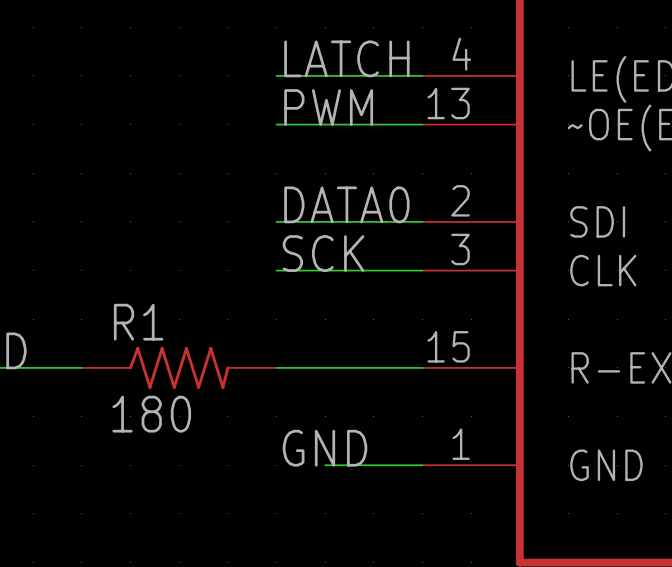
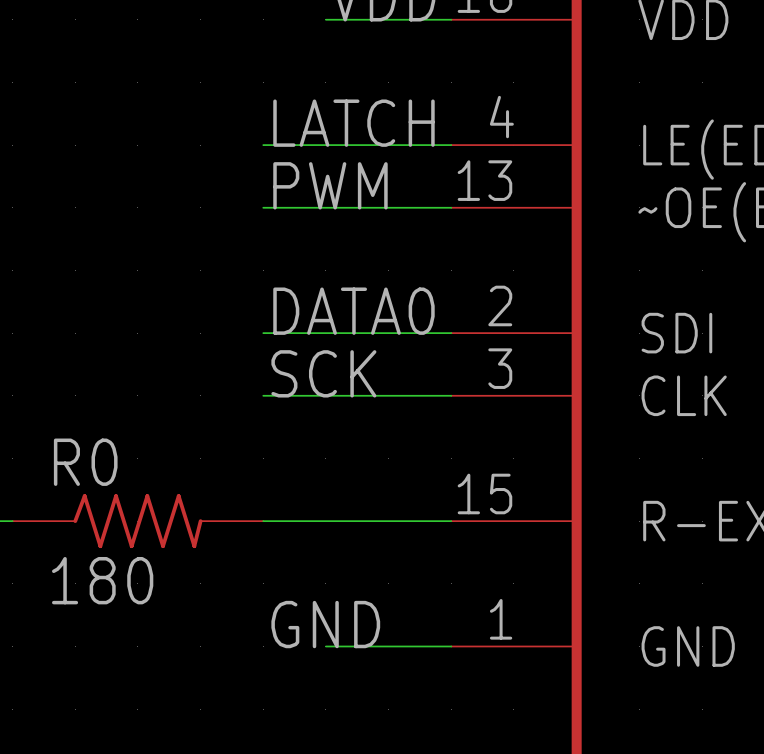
R1 name: R1 (138, 322) -> R0 (85, 462)

